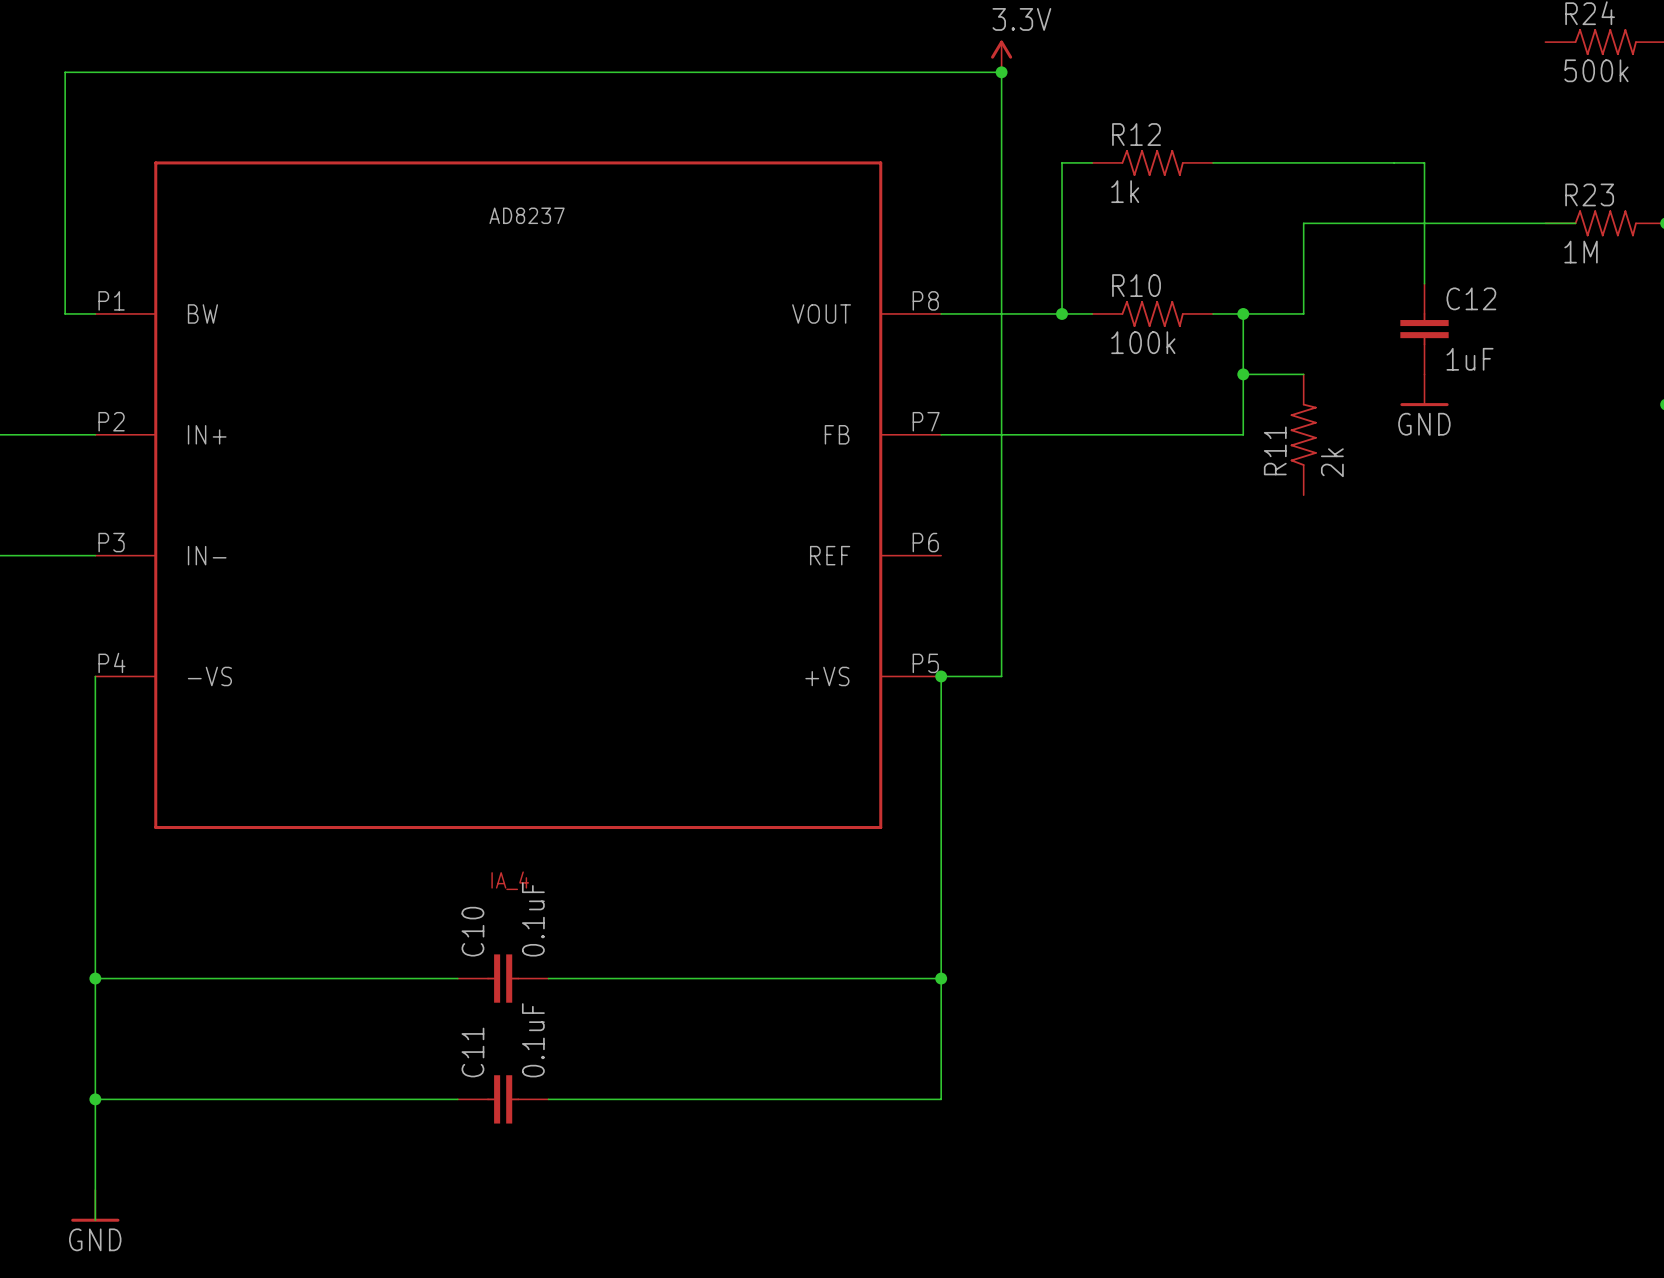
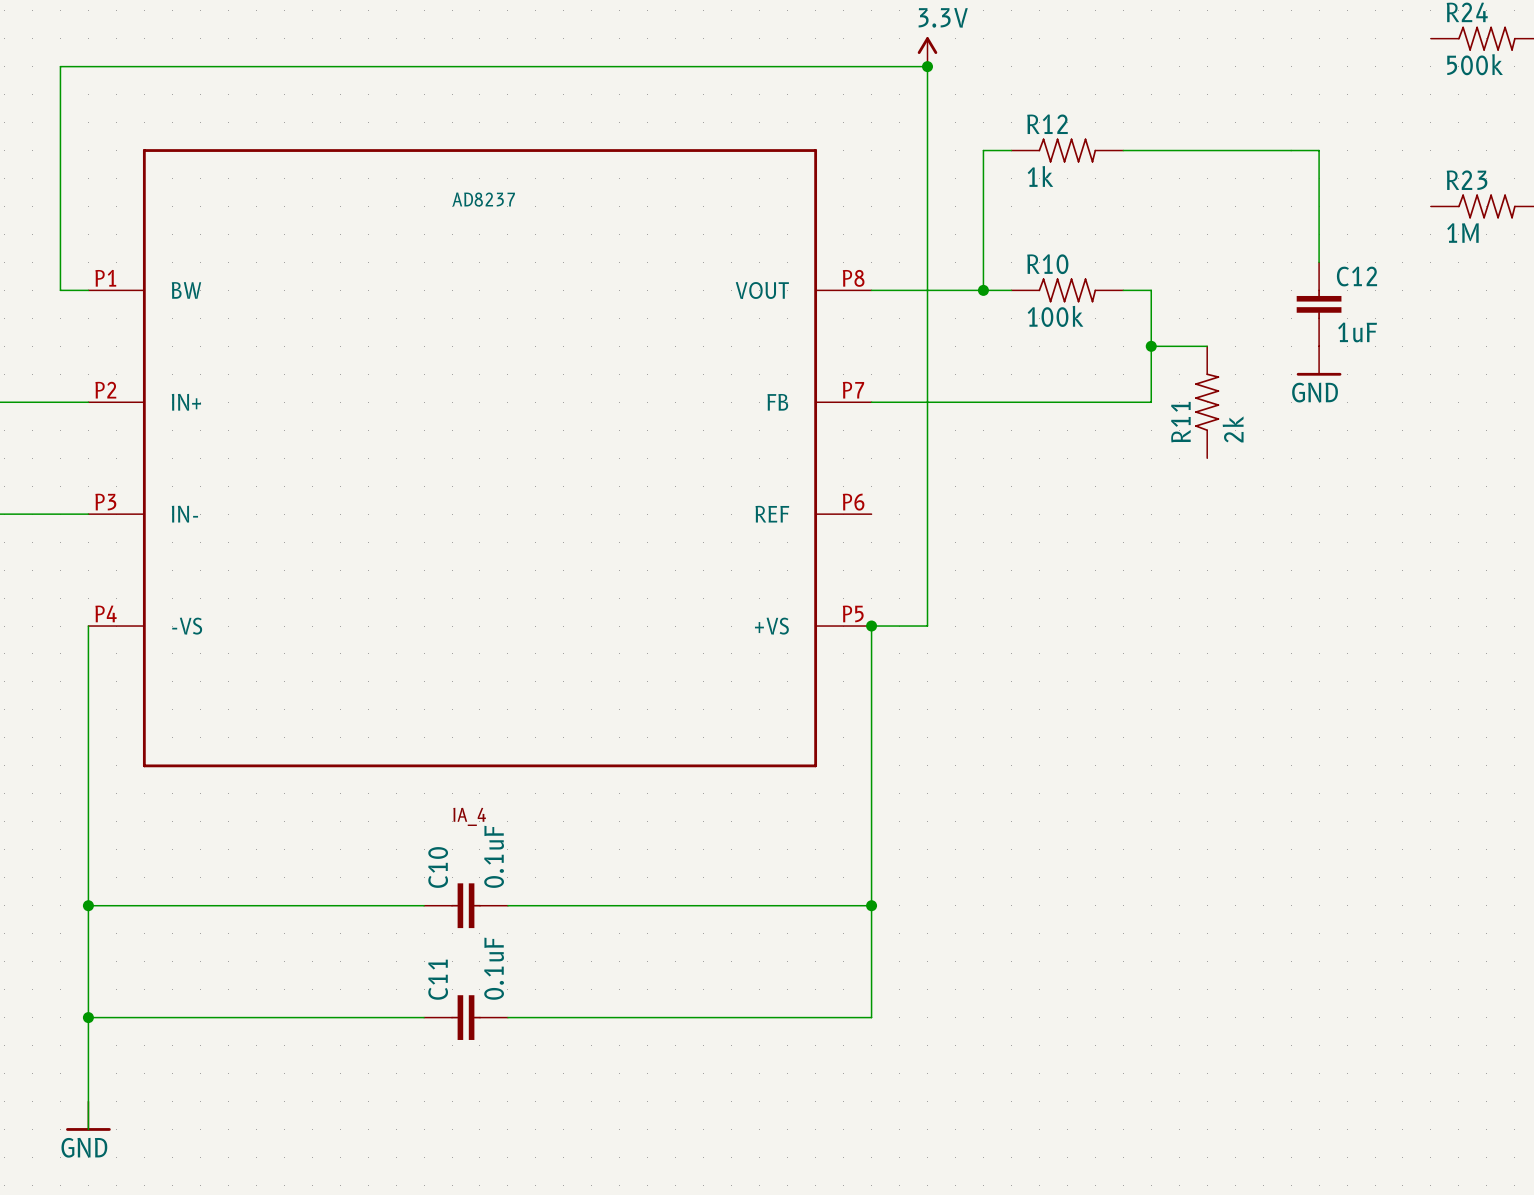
wire: (1575, 223) (1303, 223) (1303, 313) (1243, 313) -> none
junction: (1243, 313) -> none

